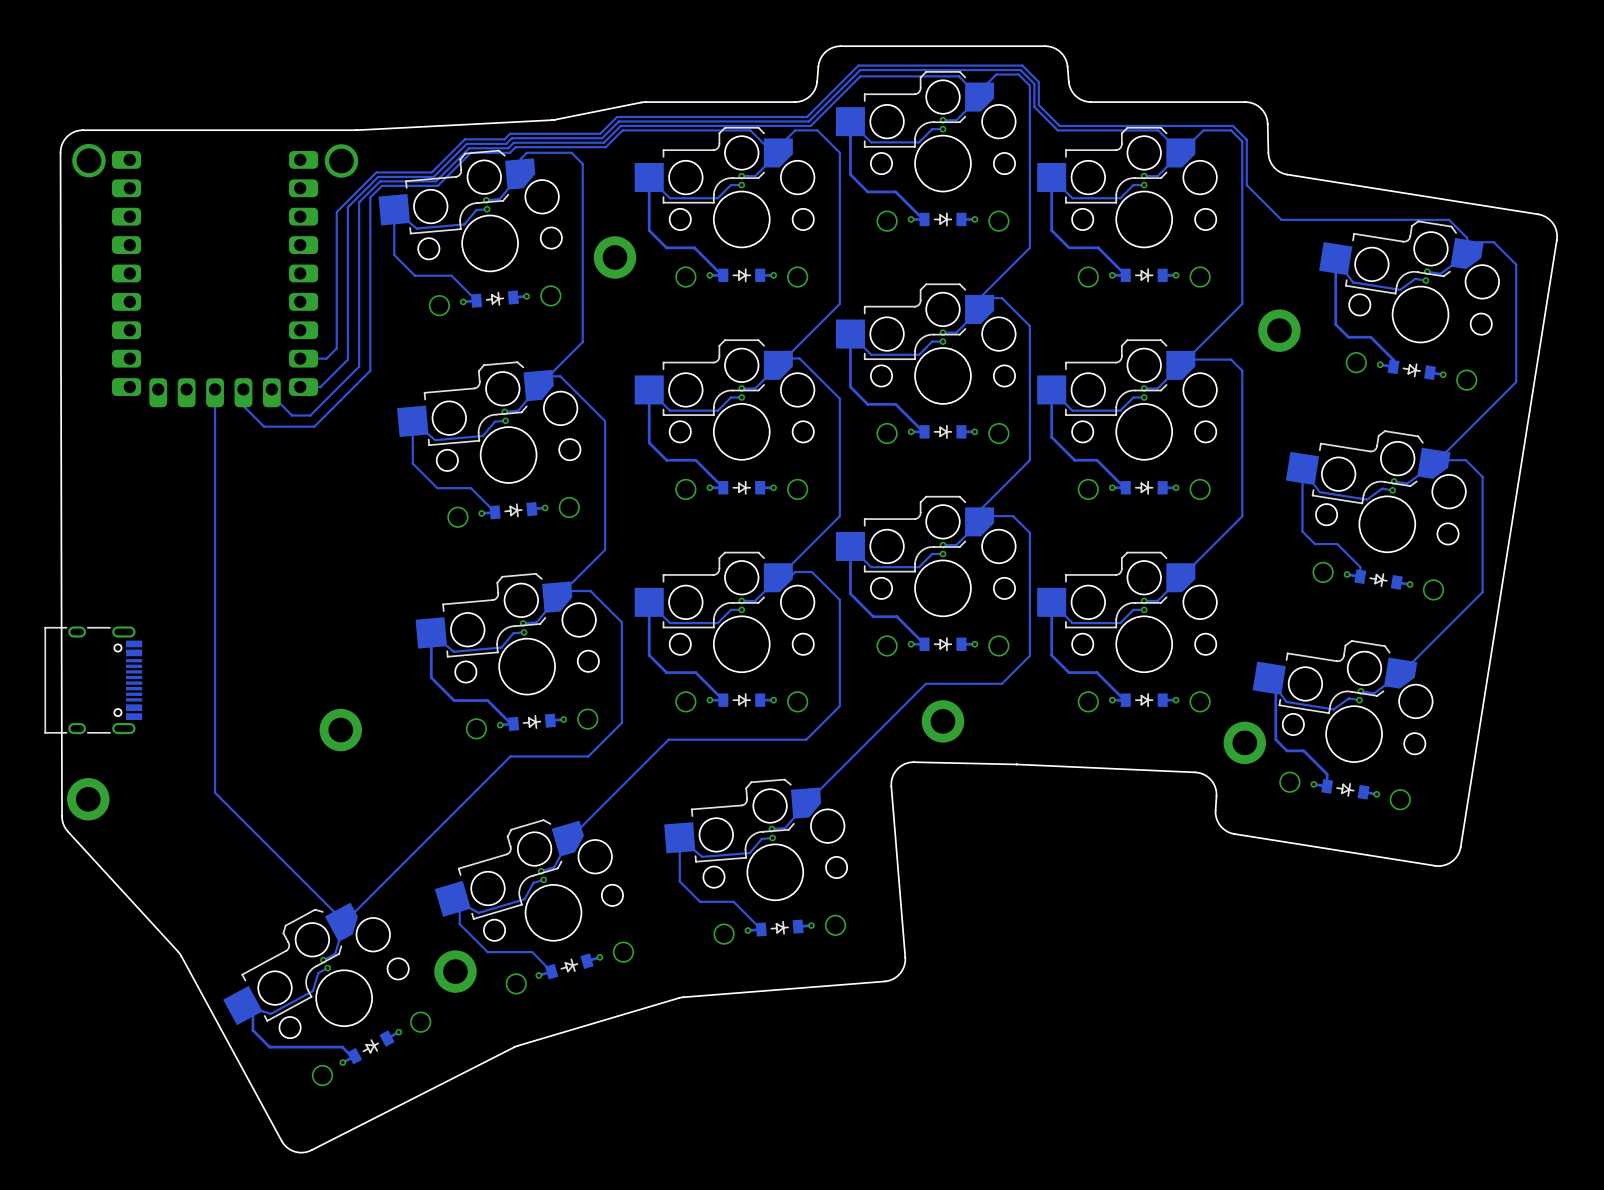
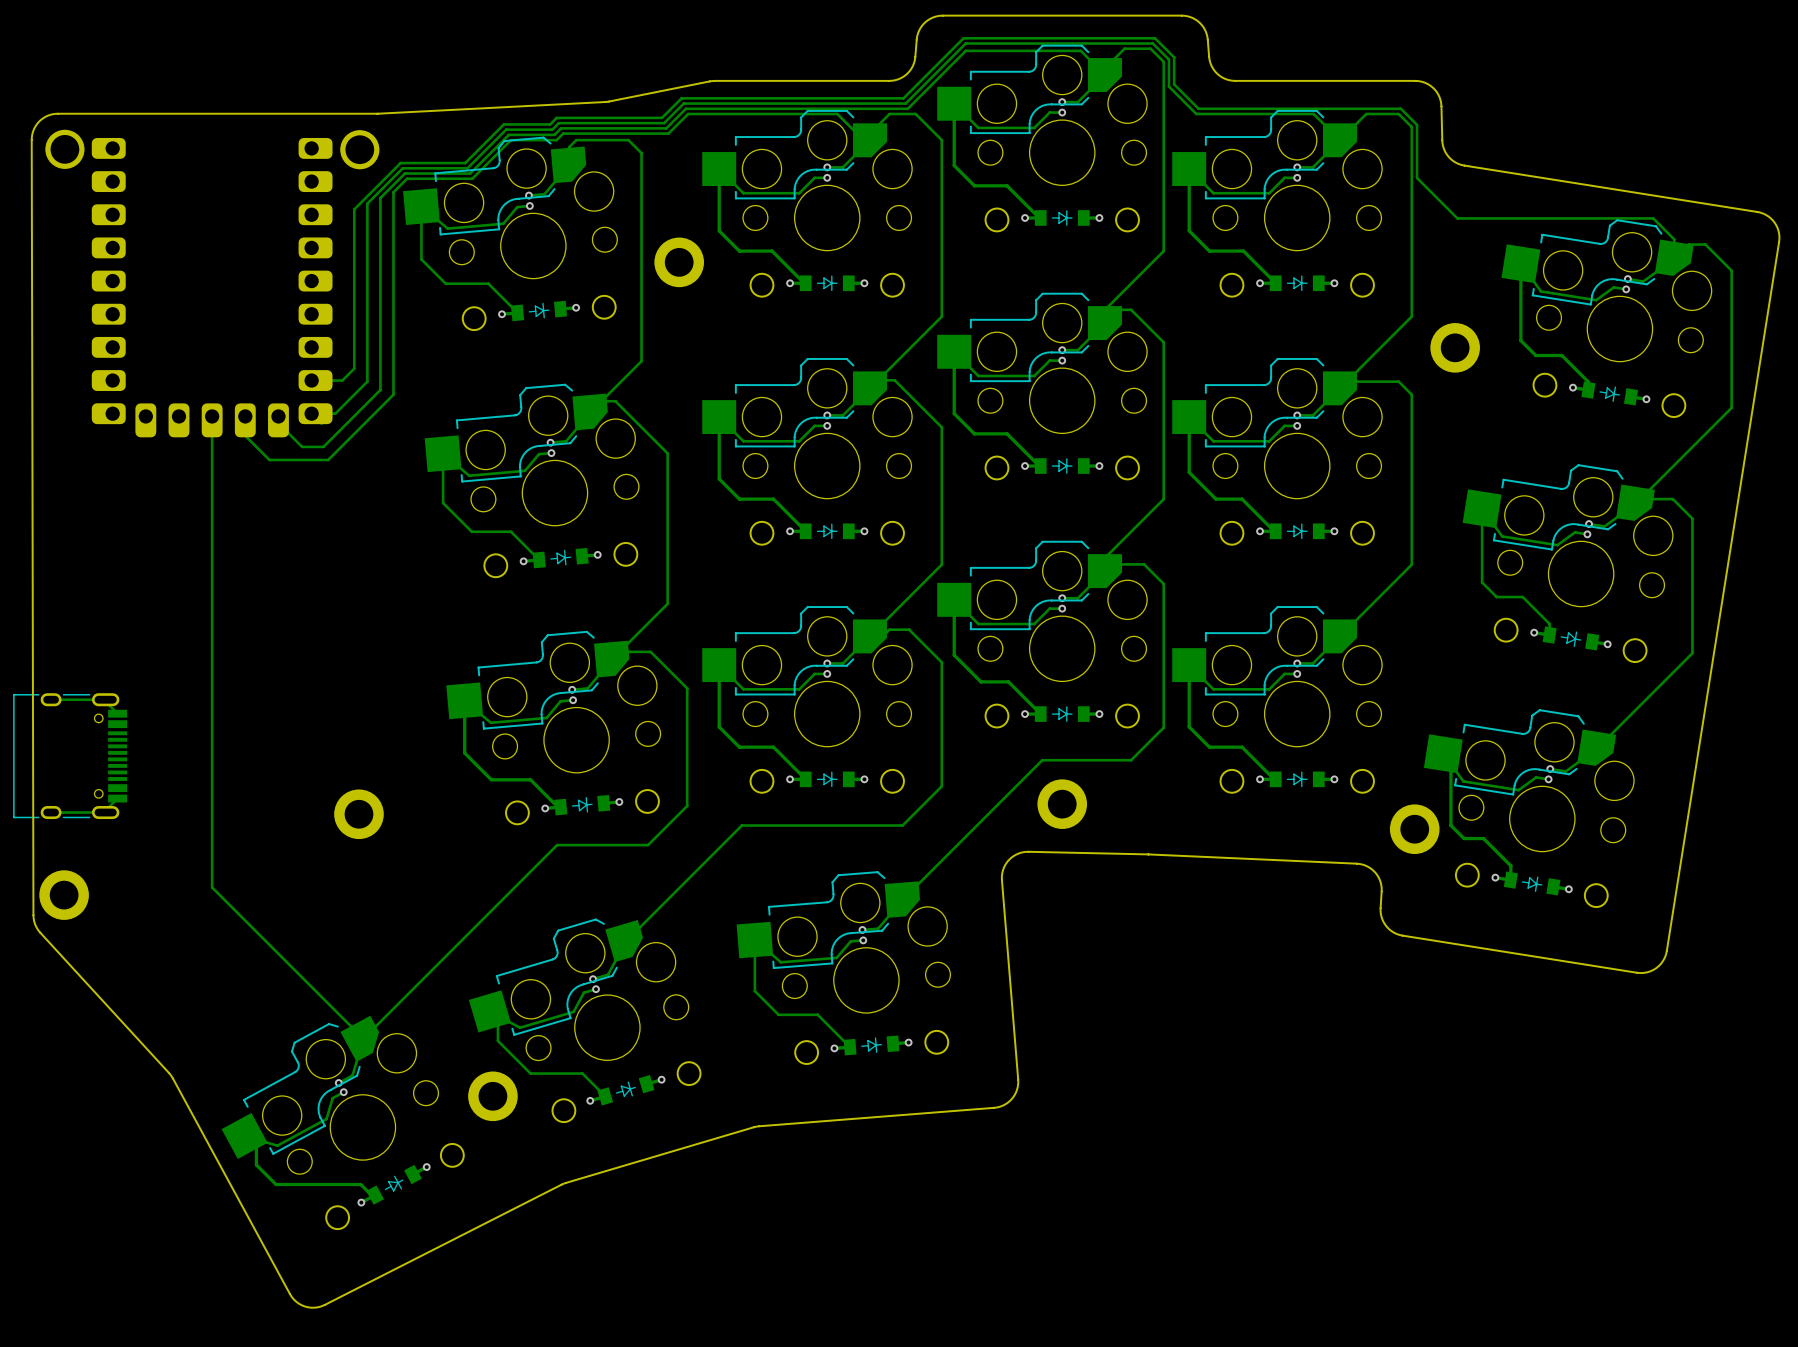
track: none -> (51, 699) (103, 699) (117, 713)
track: none -> (117, 798) (103, 812) (51, 812)

